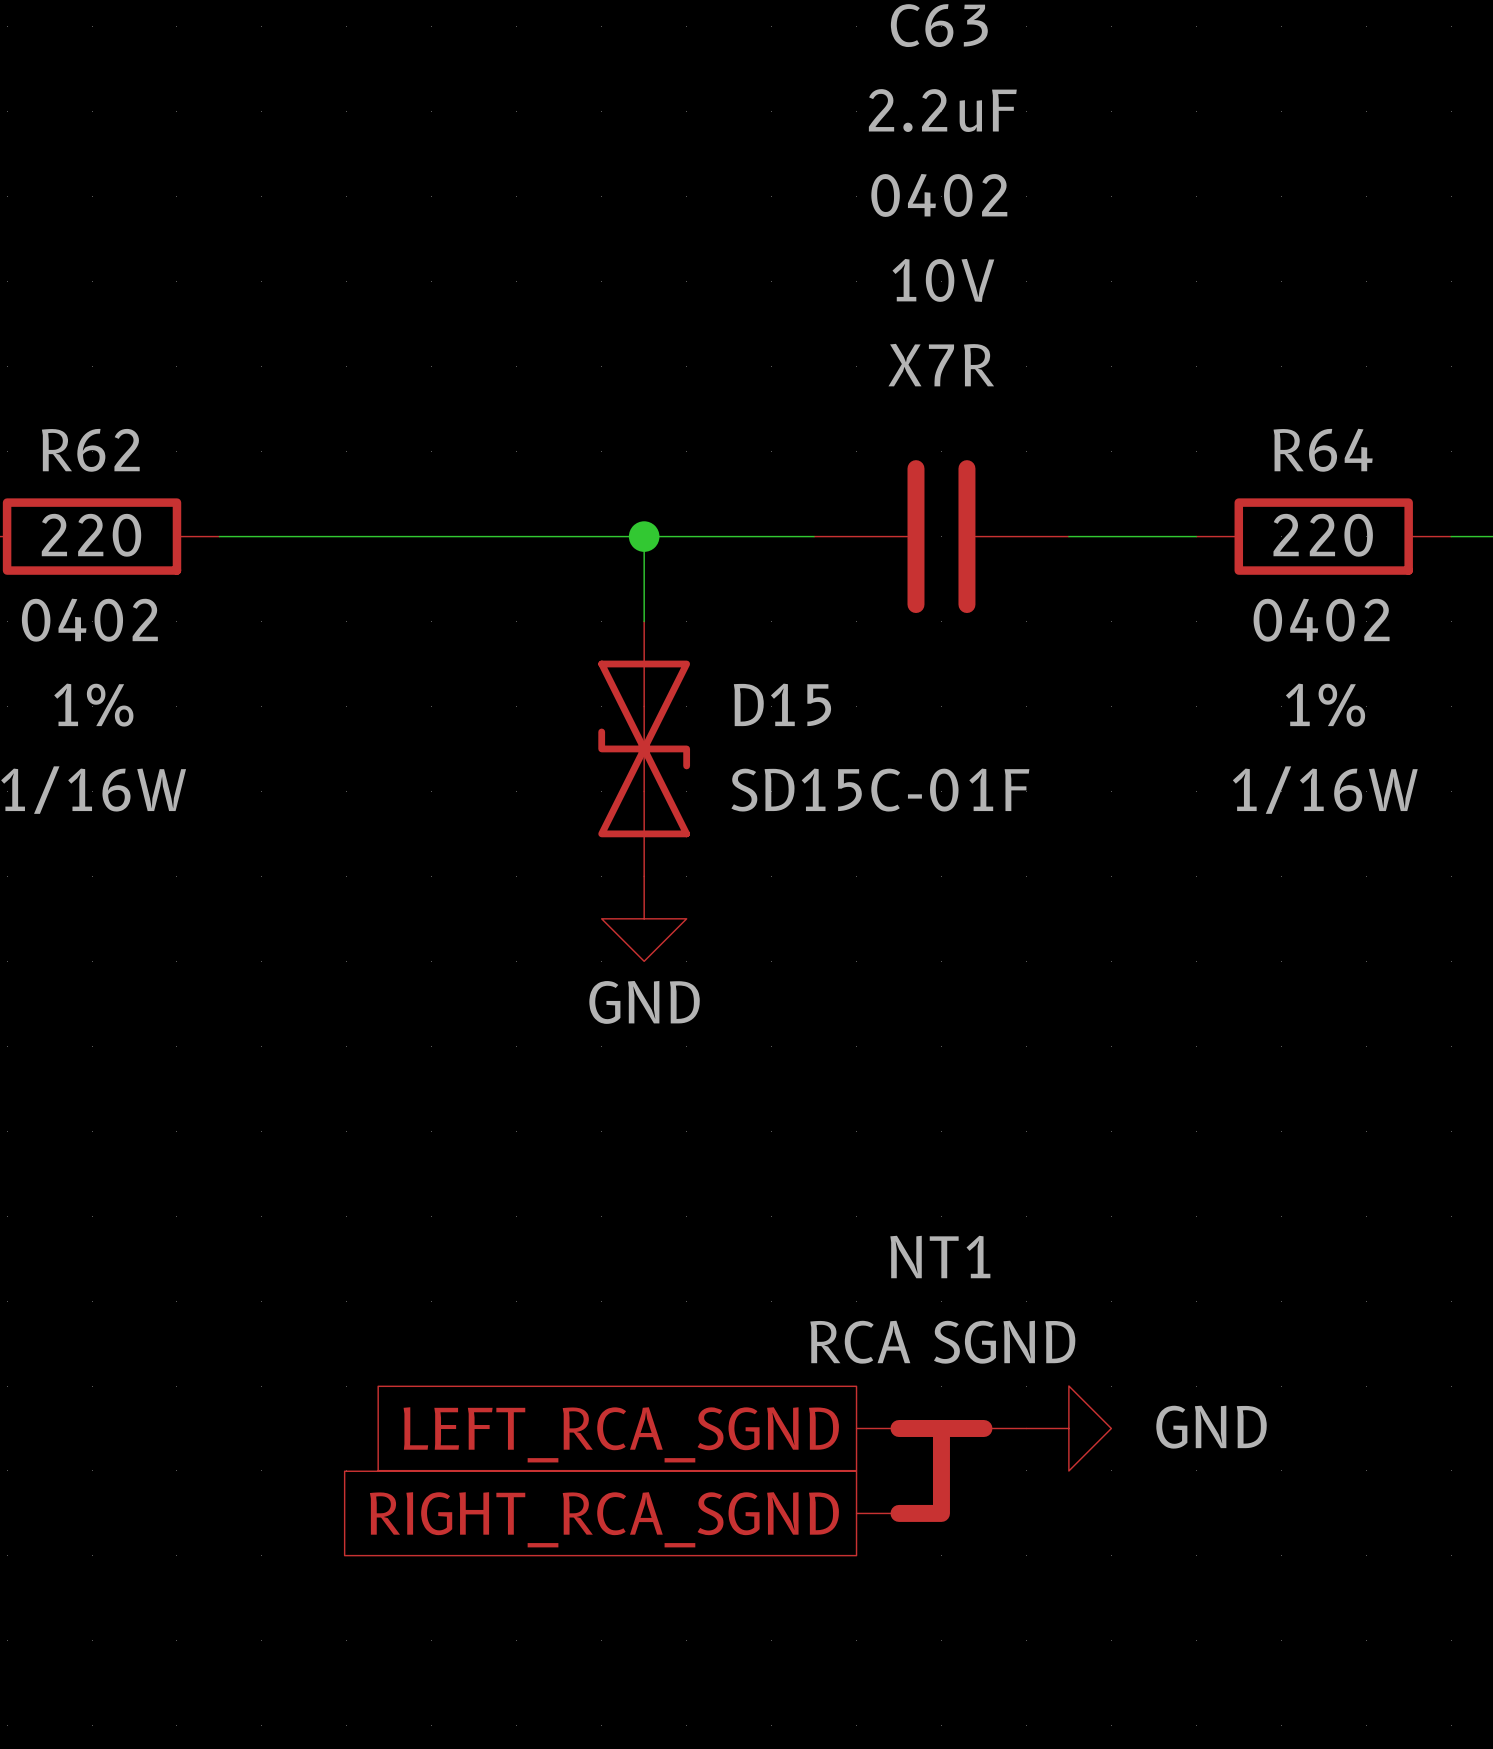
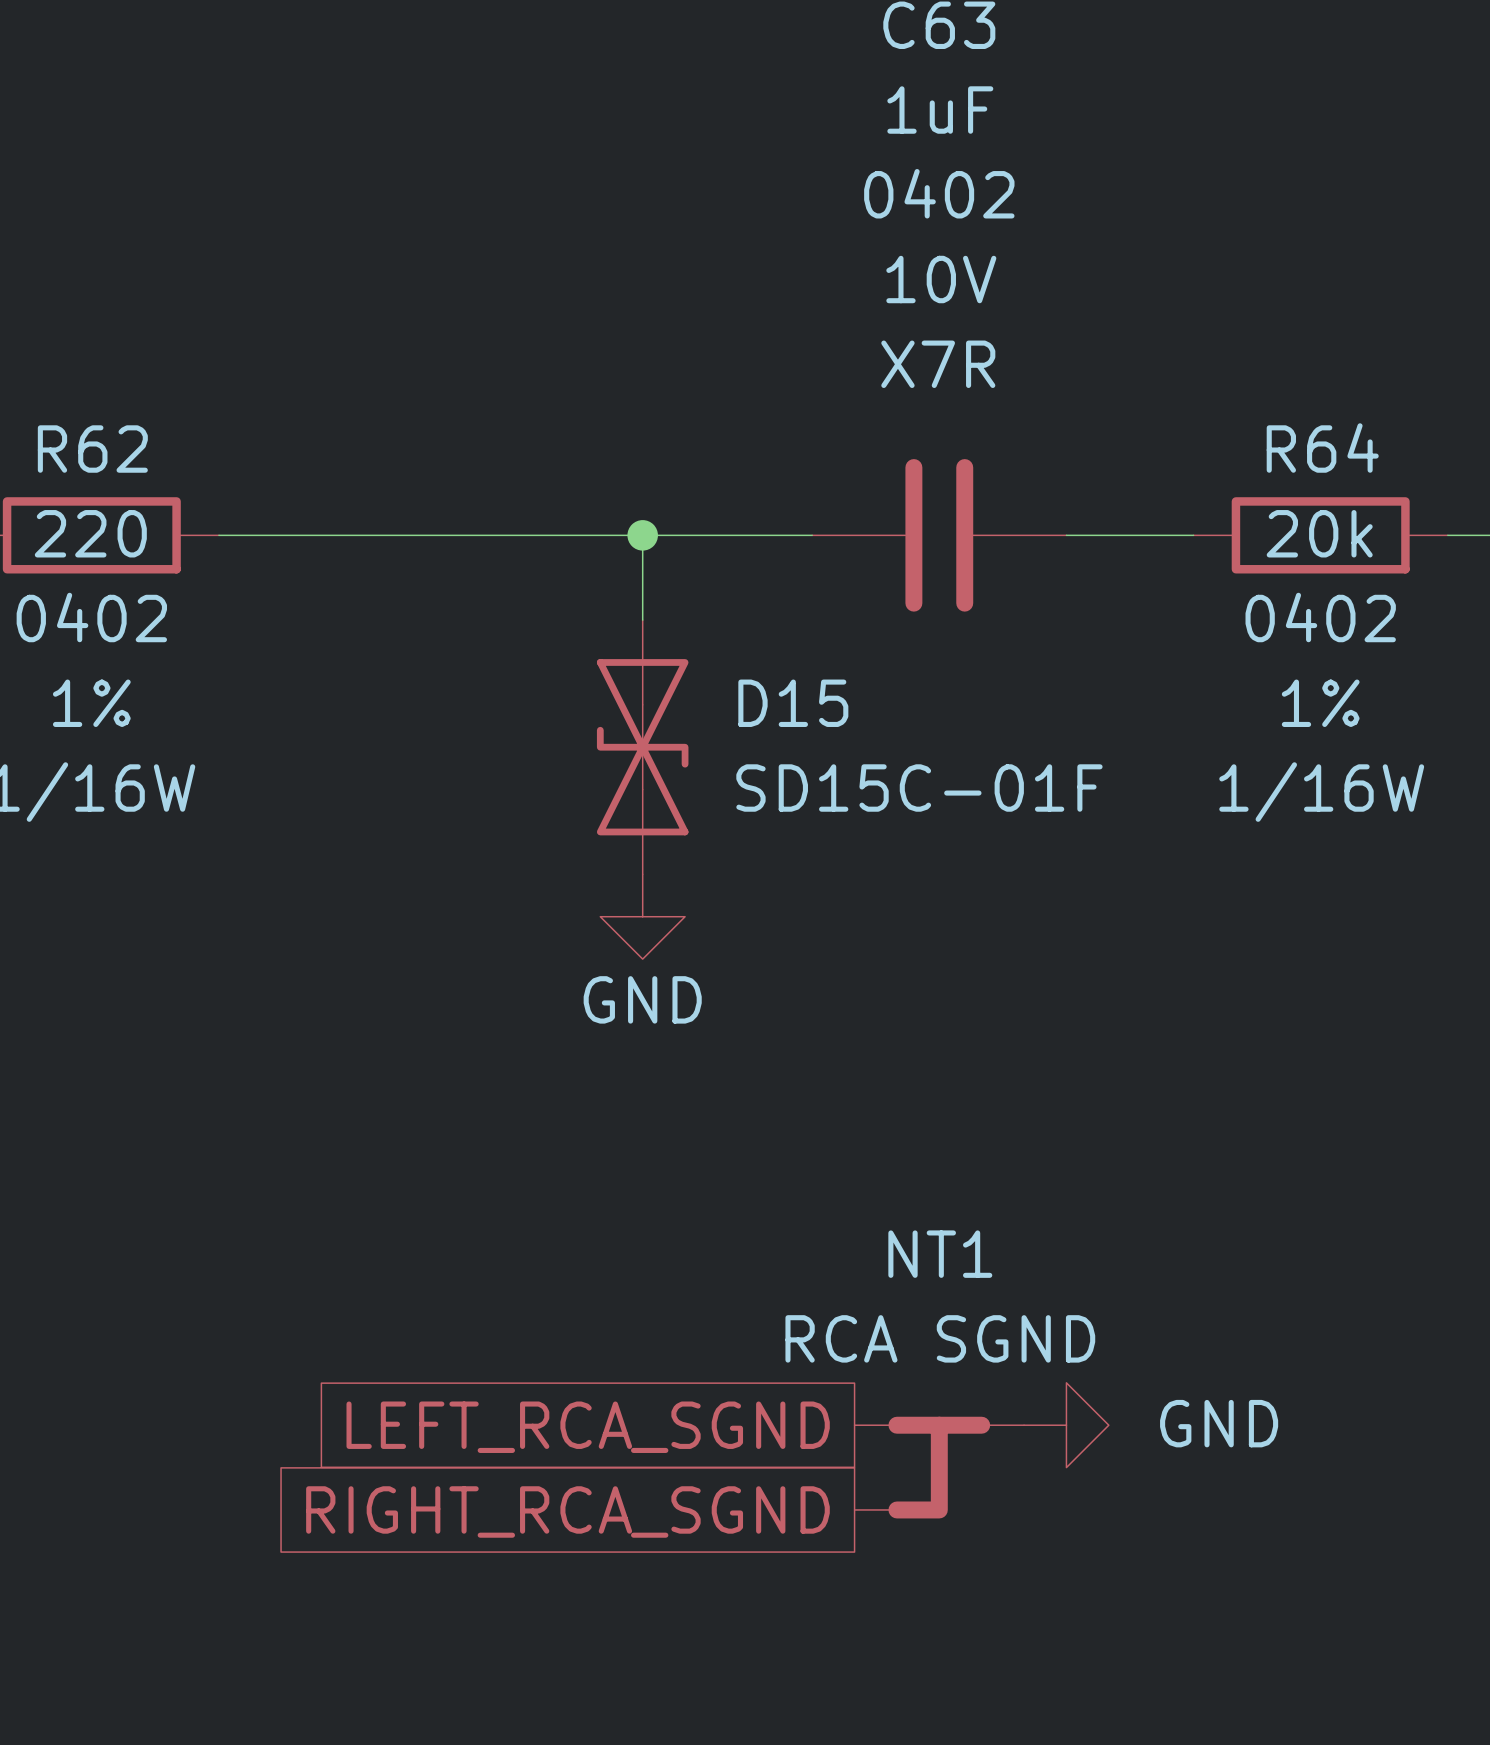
C63 value: 2.2uF (942, 110) -> 1uF (940, 110)
R64 value: 220 (1323, 535) -> 20k (1319, 533)

